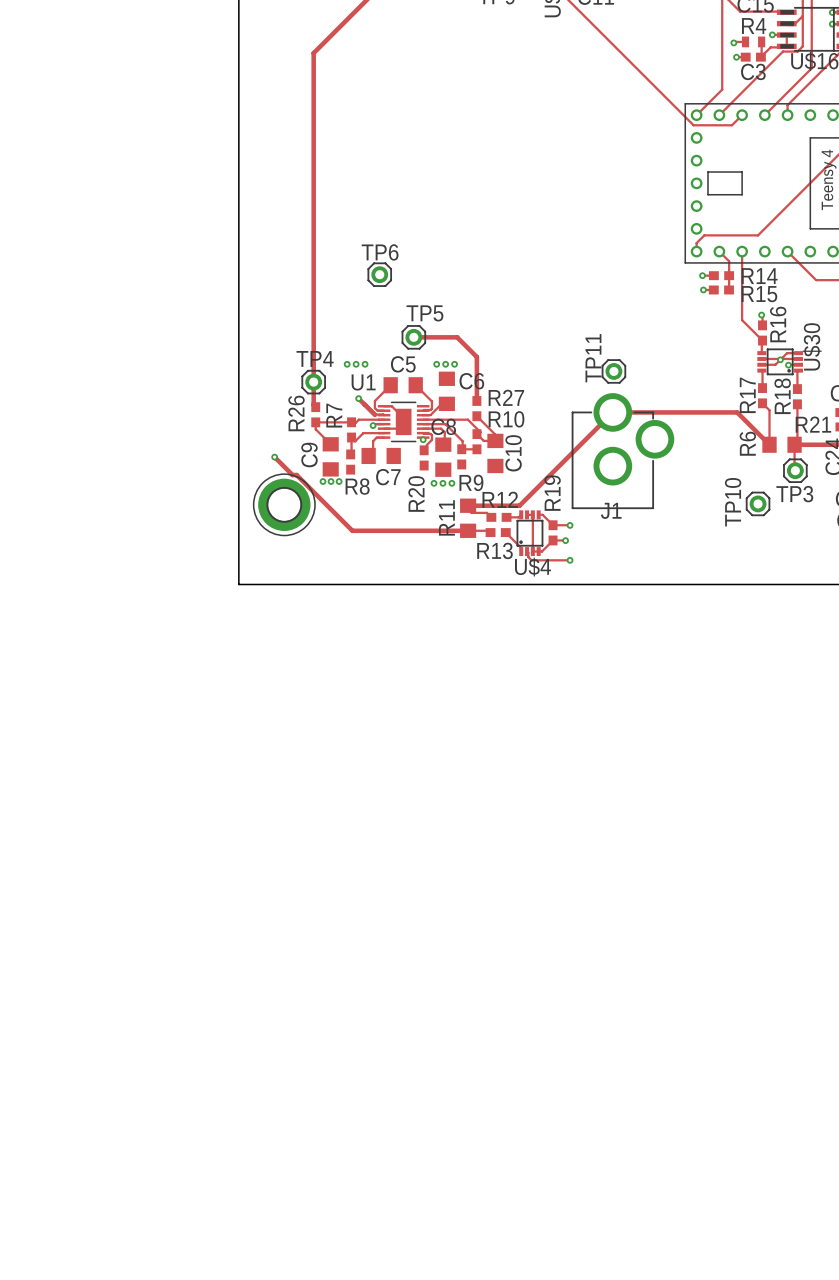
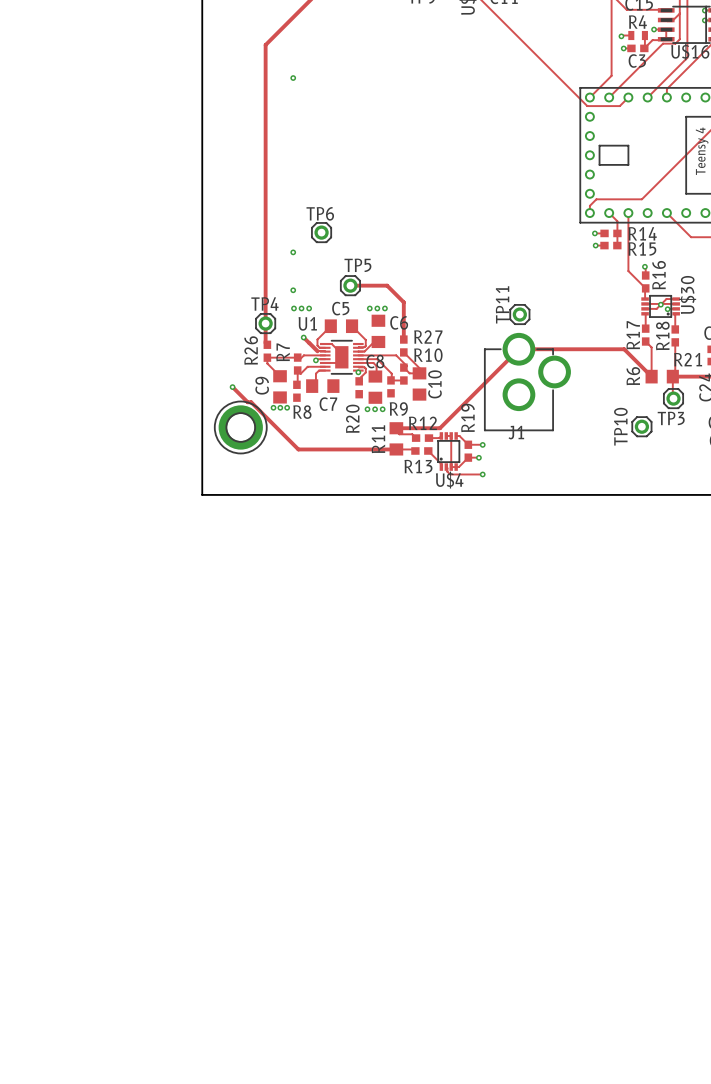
via: none -> (293, 78)
via: none -> (293, 252)
via: none -> (293, 290)

